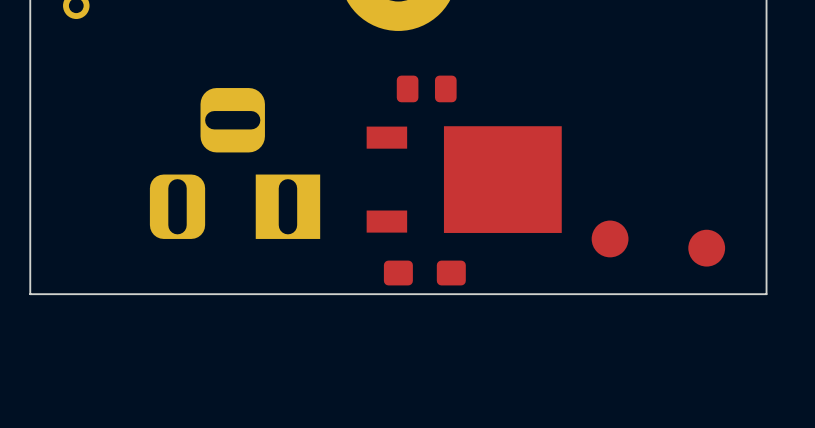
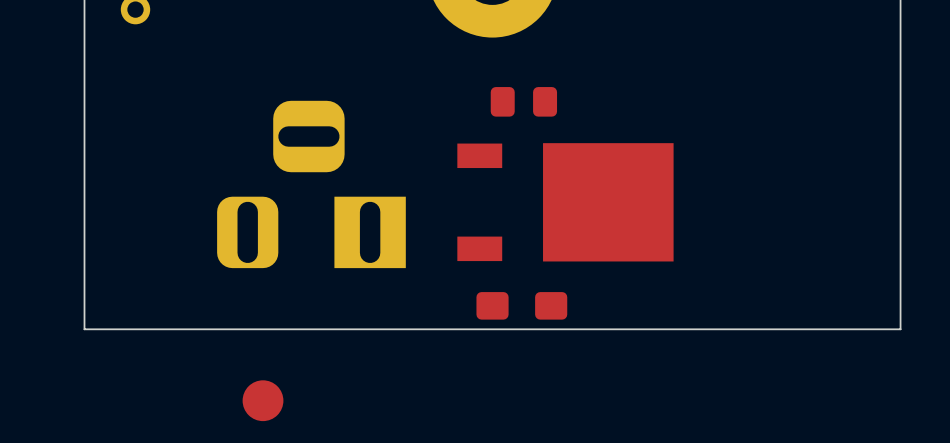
part: (610, 238) -> none
part: (706, 248) -> none
part: none -> (263, 400)

